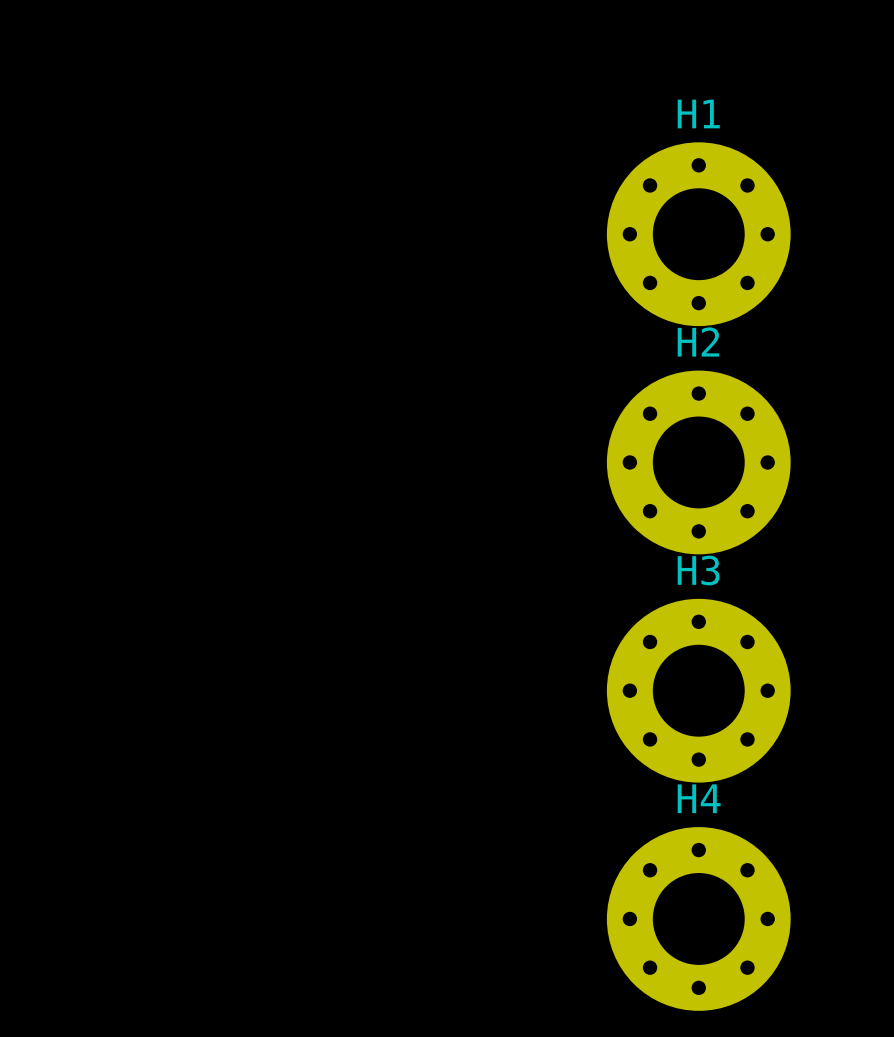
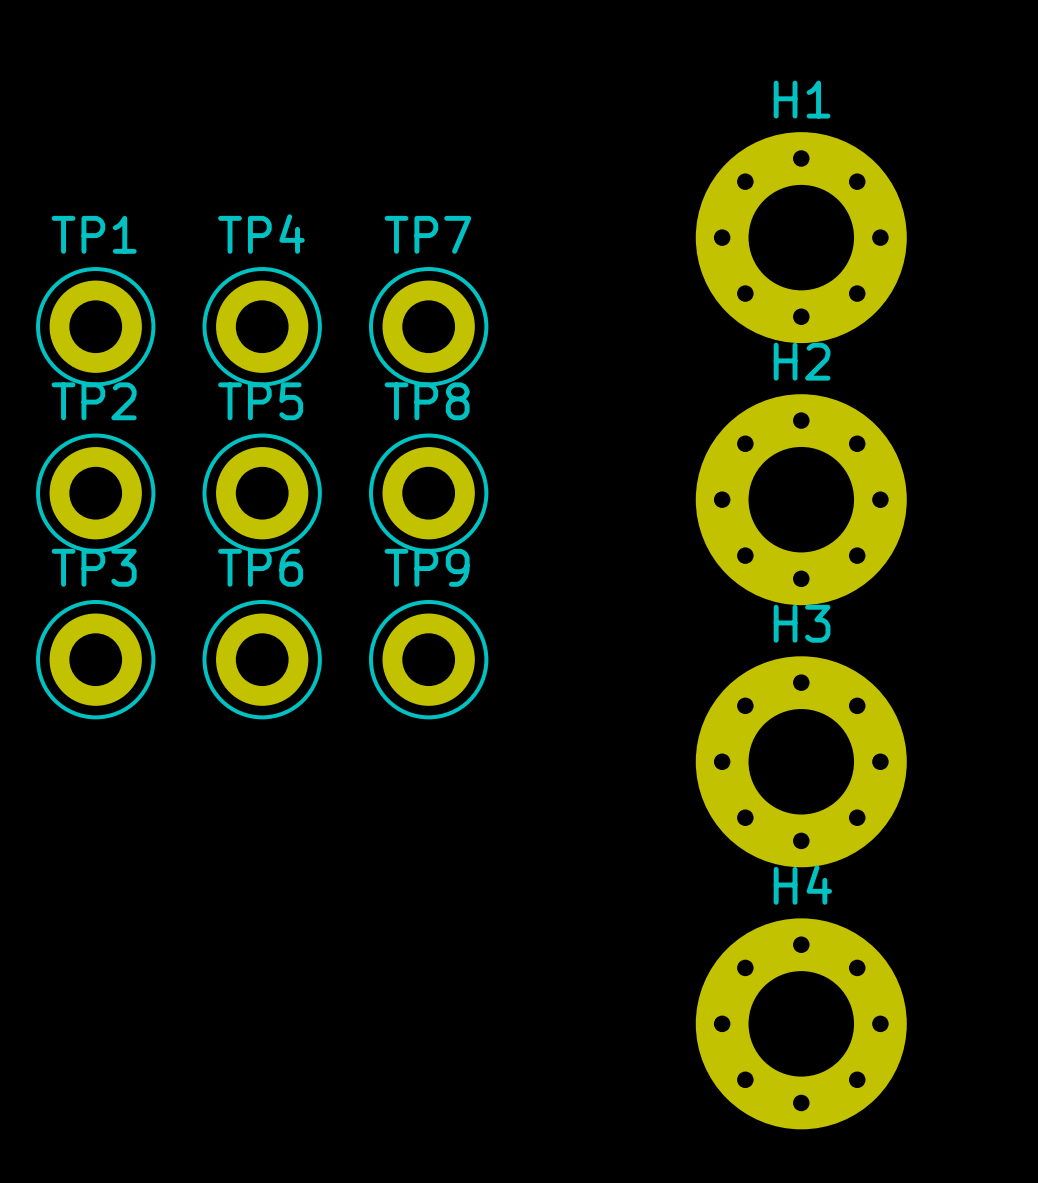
TP1: none -> (95, 326)
TP4: none -> (262, 326)
TP7: none -> (428, 326)
TP2: none -> (95, 493)
TP5: none -> (262, 493)
TP8: none -> (428, 493)
TP3: none -> (95, 659)
TP6: none -> (262, 659)
TP9: none -> (428, 659)

